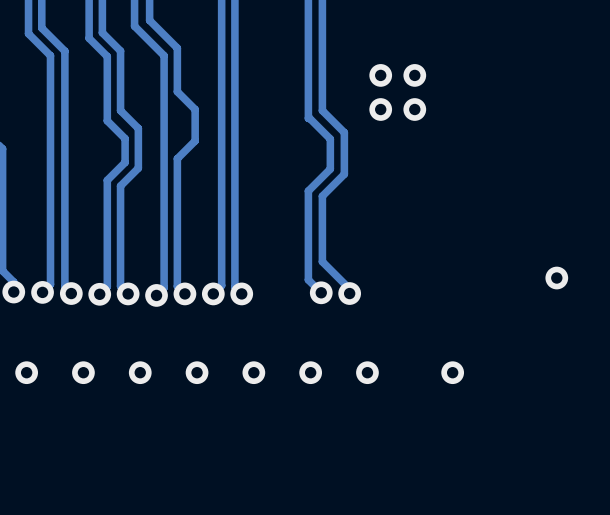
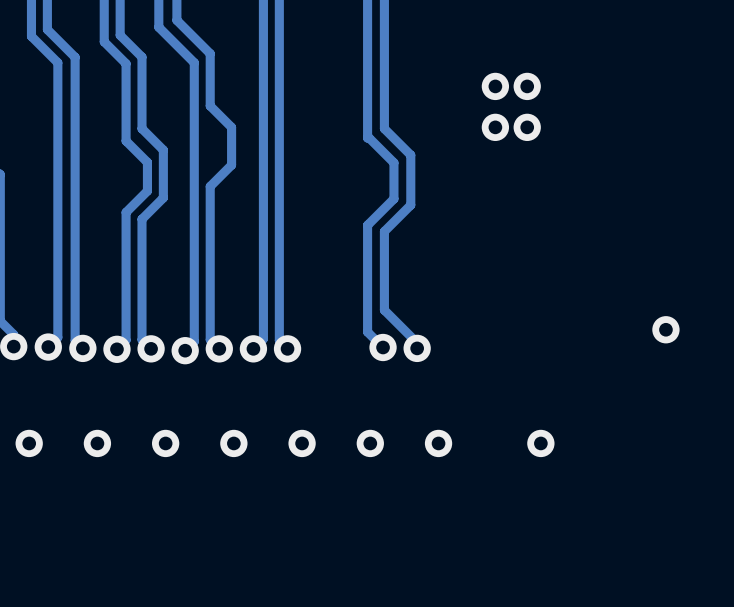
via: (380, 75) -> none
via: none -> (527, 86)
via: (380, 109) -> none
via: none -> (527, 127)

